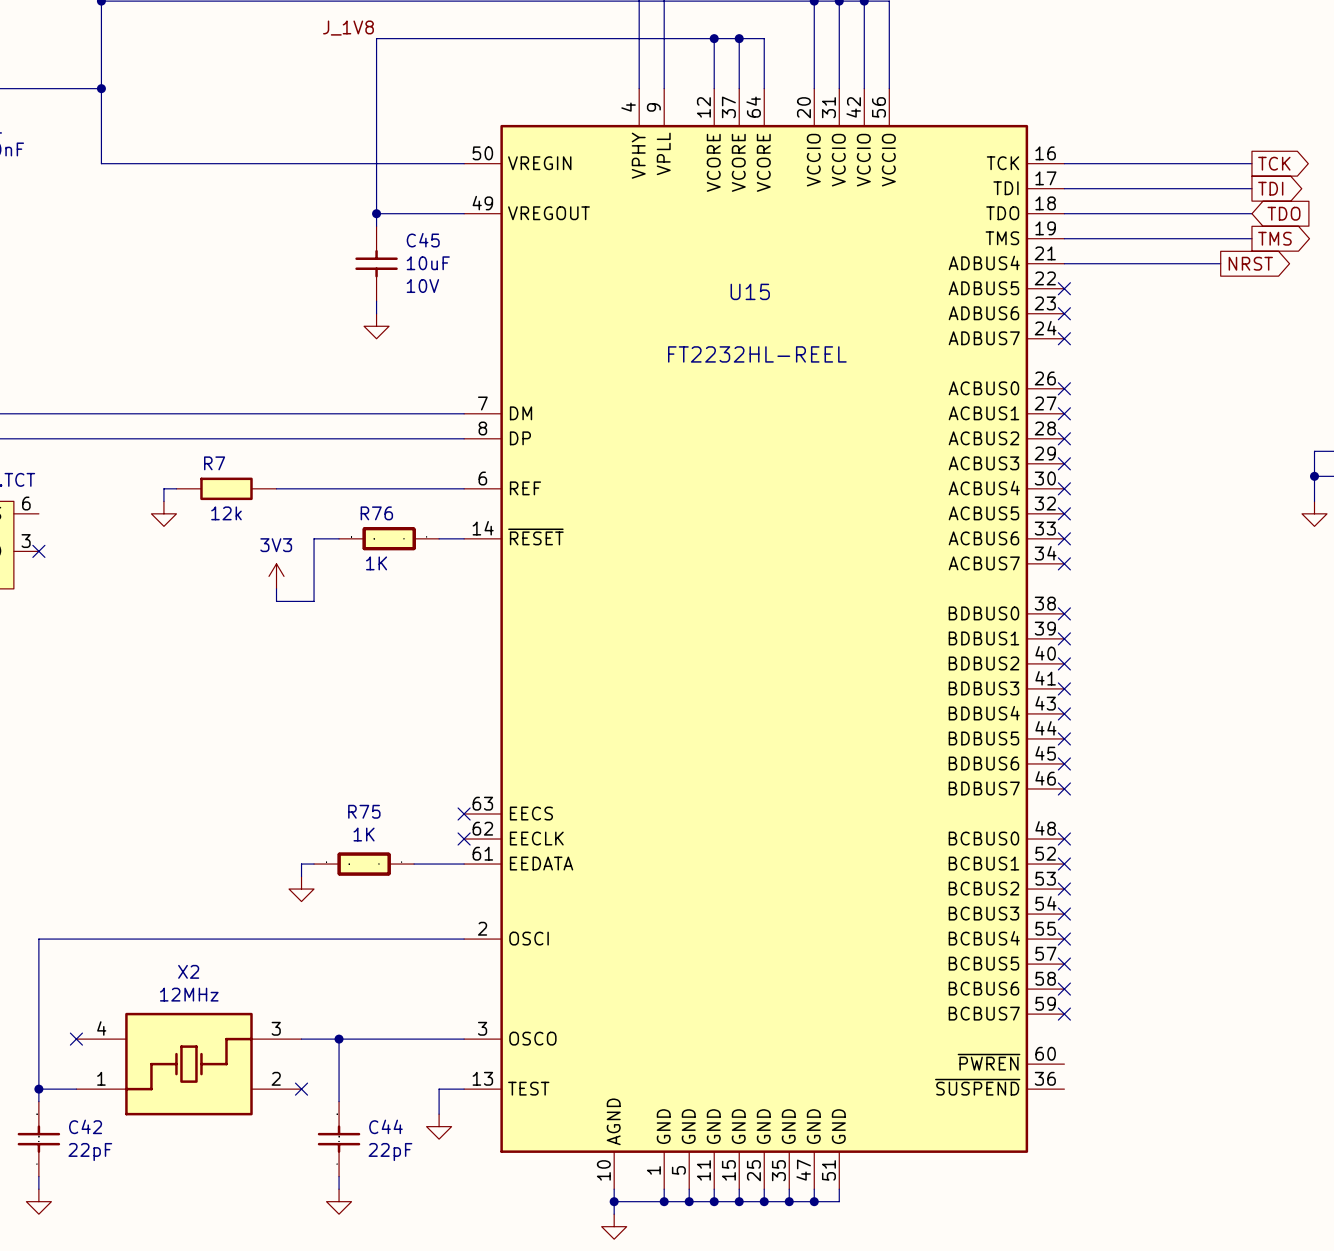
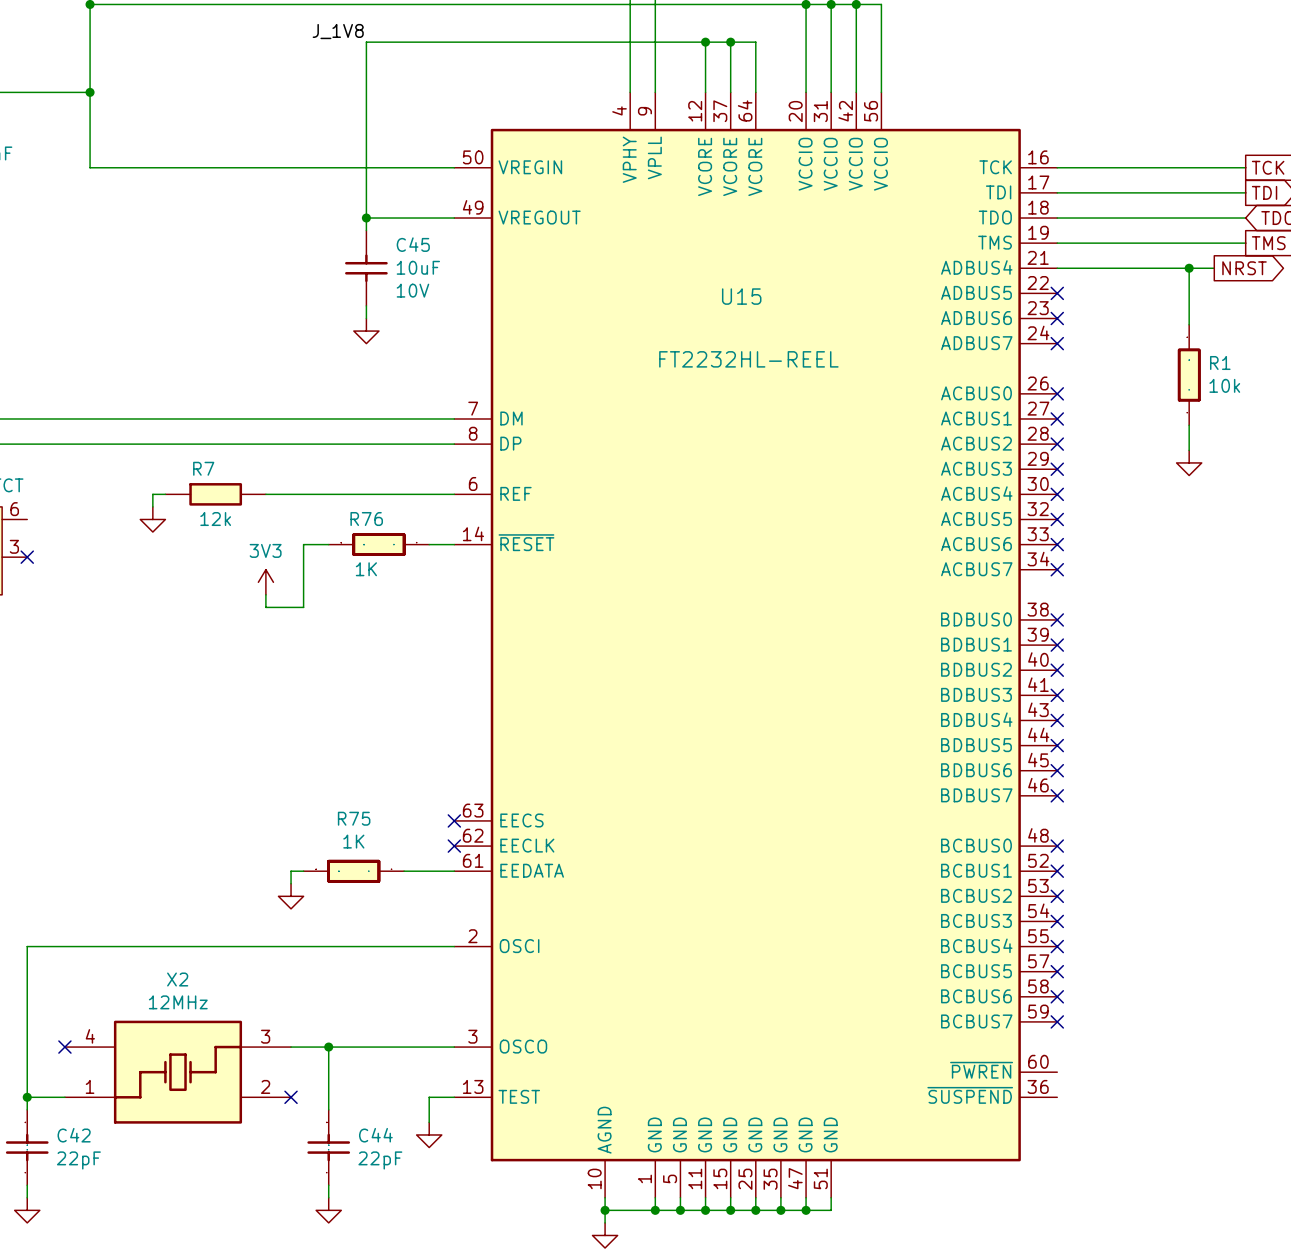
wire: none -> (1189, 268) (1189, 324)
junction: none -> (1189, 268)
R1: none -> (1189, 375)
wire: none -> (1189, 425) (1189, 450)
power symbol: none -> (1189, 462)

